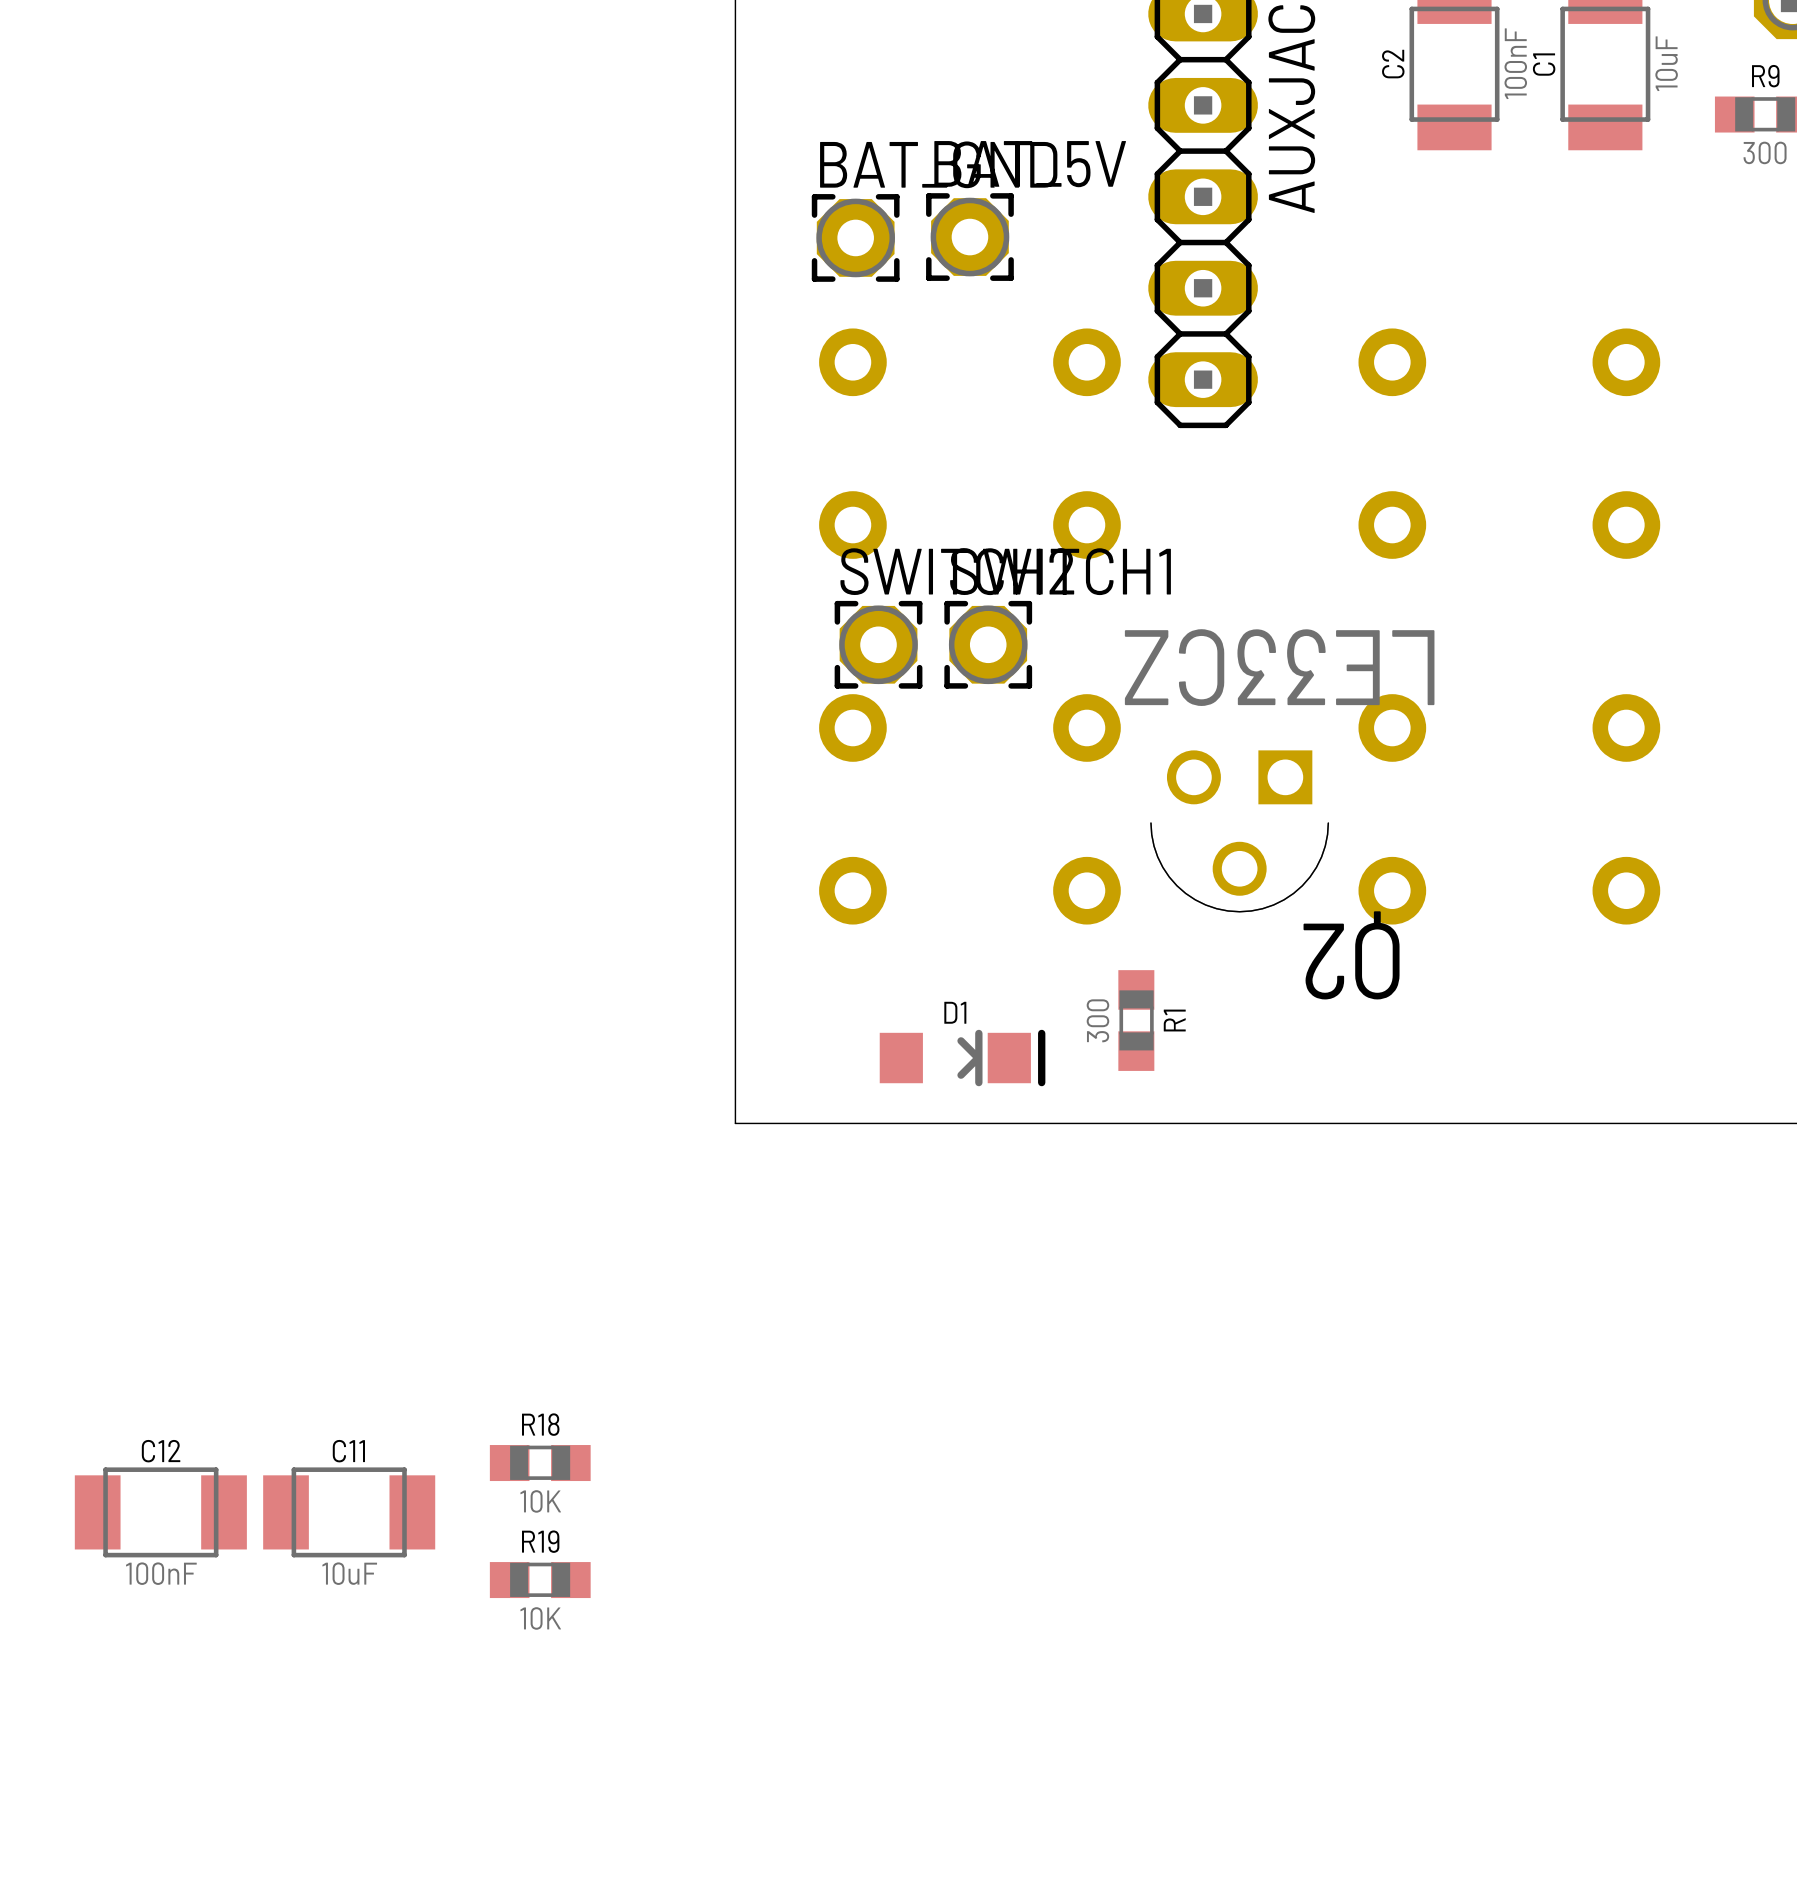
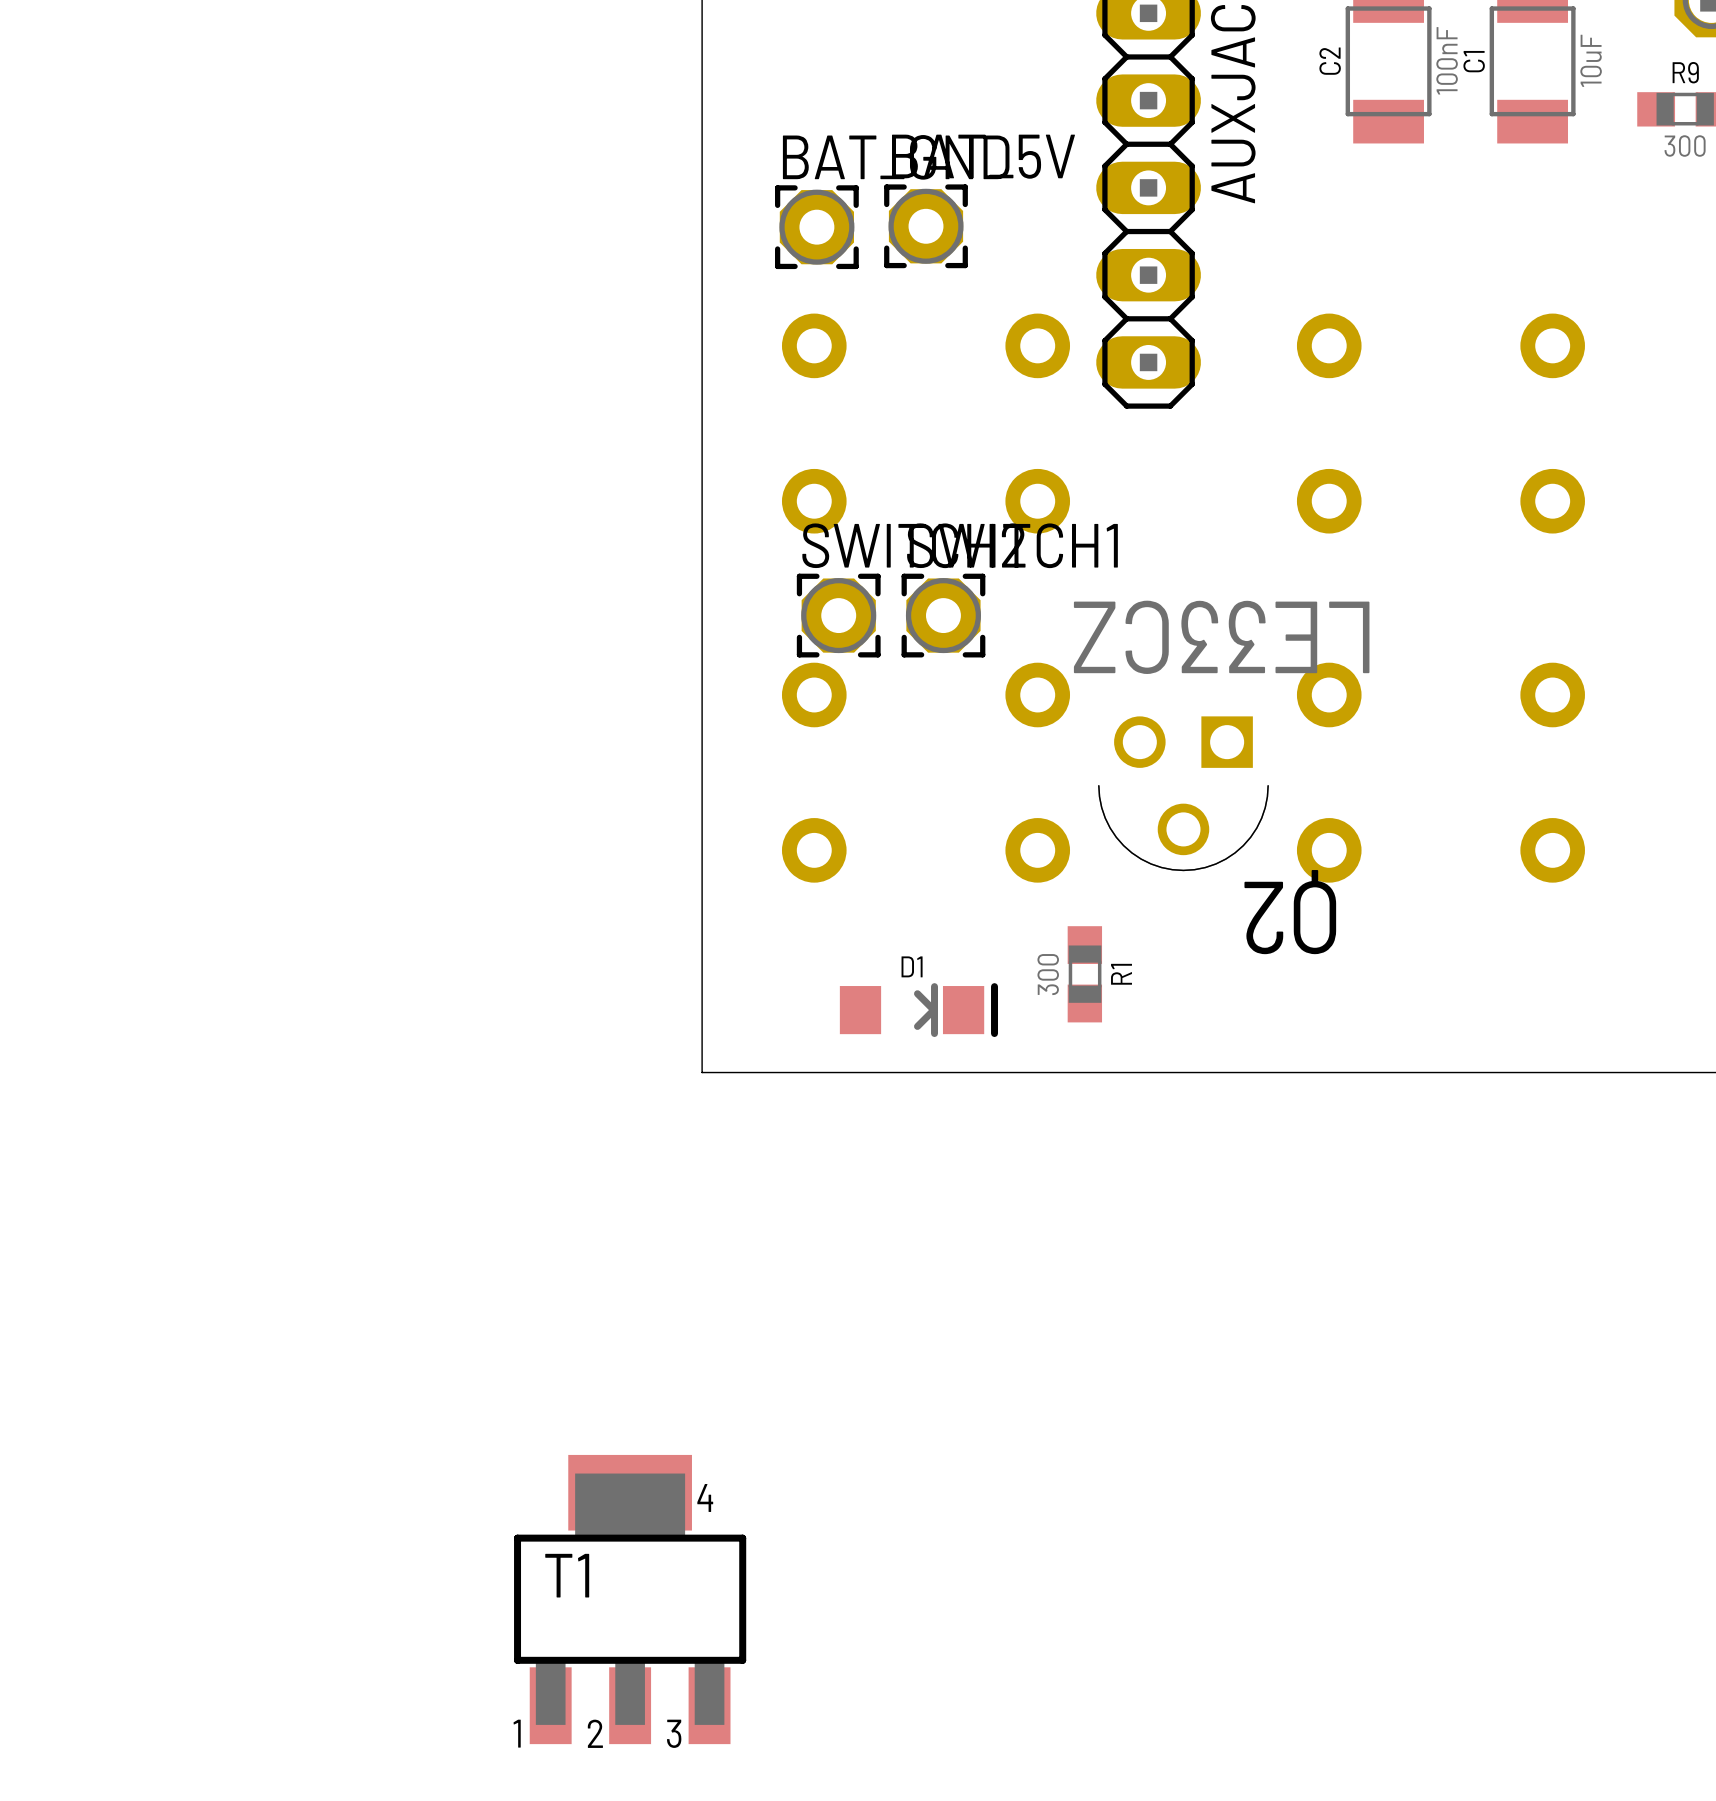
R18: 10K (540, 1463) -> none
C12: 100nF (160, 1512) -> none
C11: 10uF (349, 1512) -> none
R19: 10K (540, 1580) -> none
T1: none -> (630, 1599)

